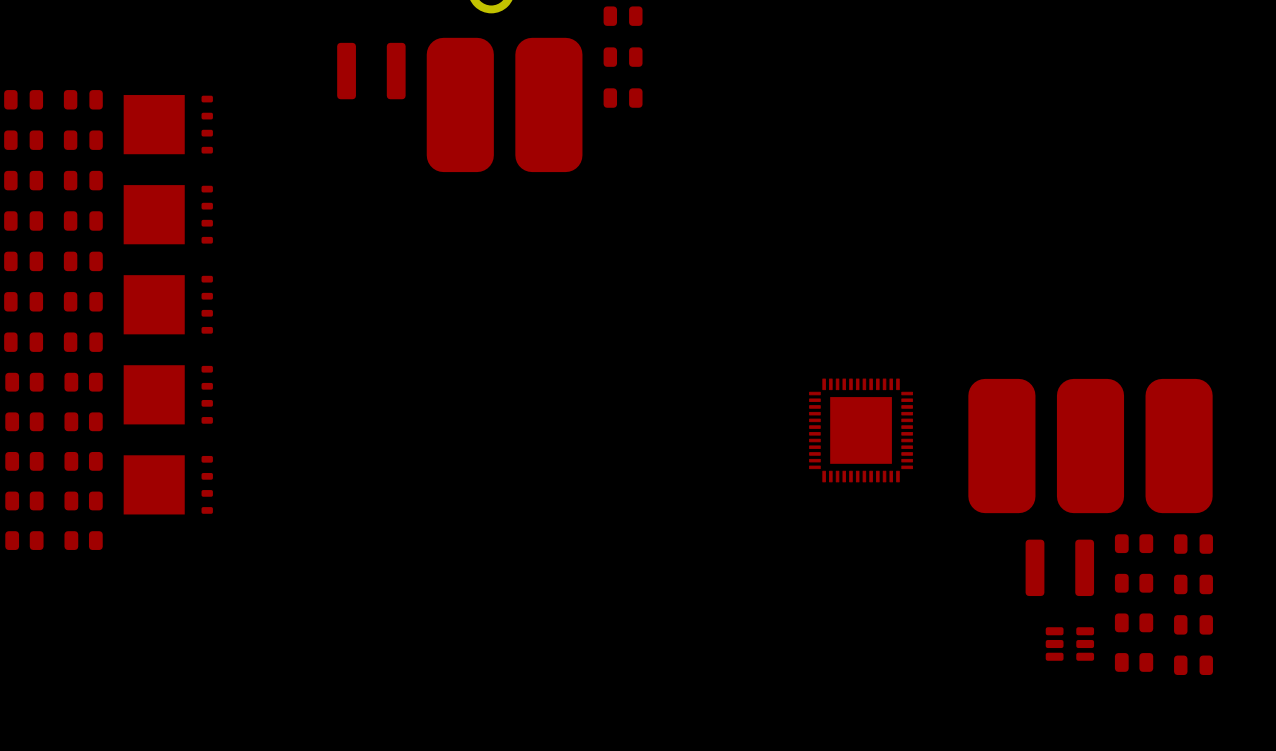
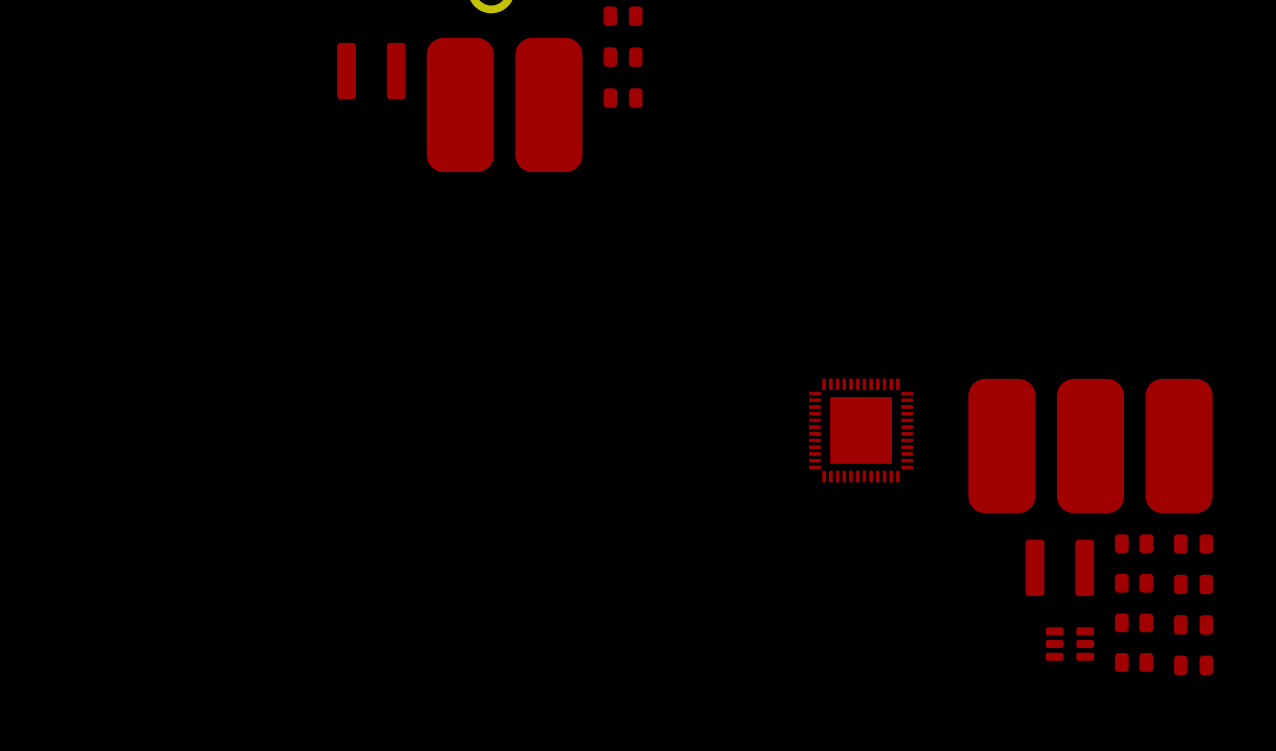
part: (23, 99) -> none
part: (83, 99) -> none
part: (168, 124) -> none
part: (23, 140) -> none
part: (83, 140) -> none
part: (23, 180) -> none
part: (83, 180) -> none
part: (168, 214) -> none
part: (23, 220) -> none
part: (83, 220) -> none
part: (23, 261) -> none
part: (83, 261) -> none
part: (23, 301) -> none
part: (83, 301) -> none
part: (168, 304) -> none
part: (23, 342) -> none
part: (83, 342) -> none
part: (24, 382) -> none
part: (83, 382) -> none
part: (168, 394) -> none
part: (24, 421) -> none
part: (83, 421) -> none
part: (24, 461) -> none
part: (83, 461) -> none
part: (168, 484) -> none
part: (24, 500) -> none
part: (83, 500) -> none
part: (24, 540) -> none
part: (83, 540) -> none

